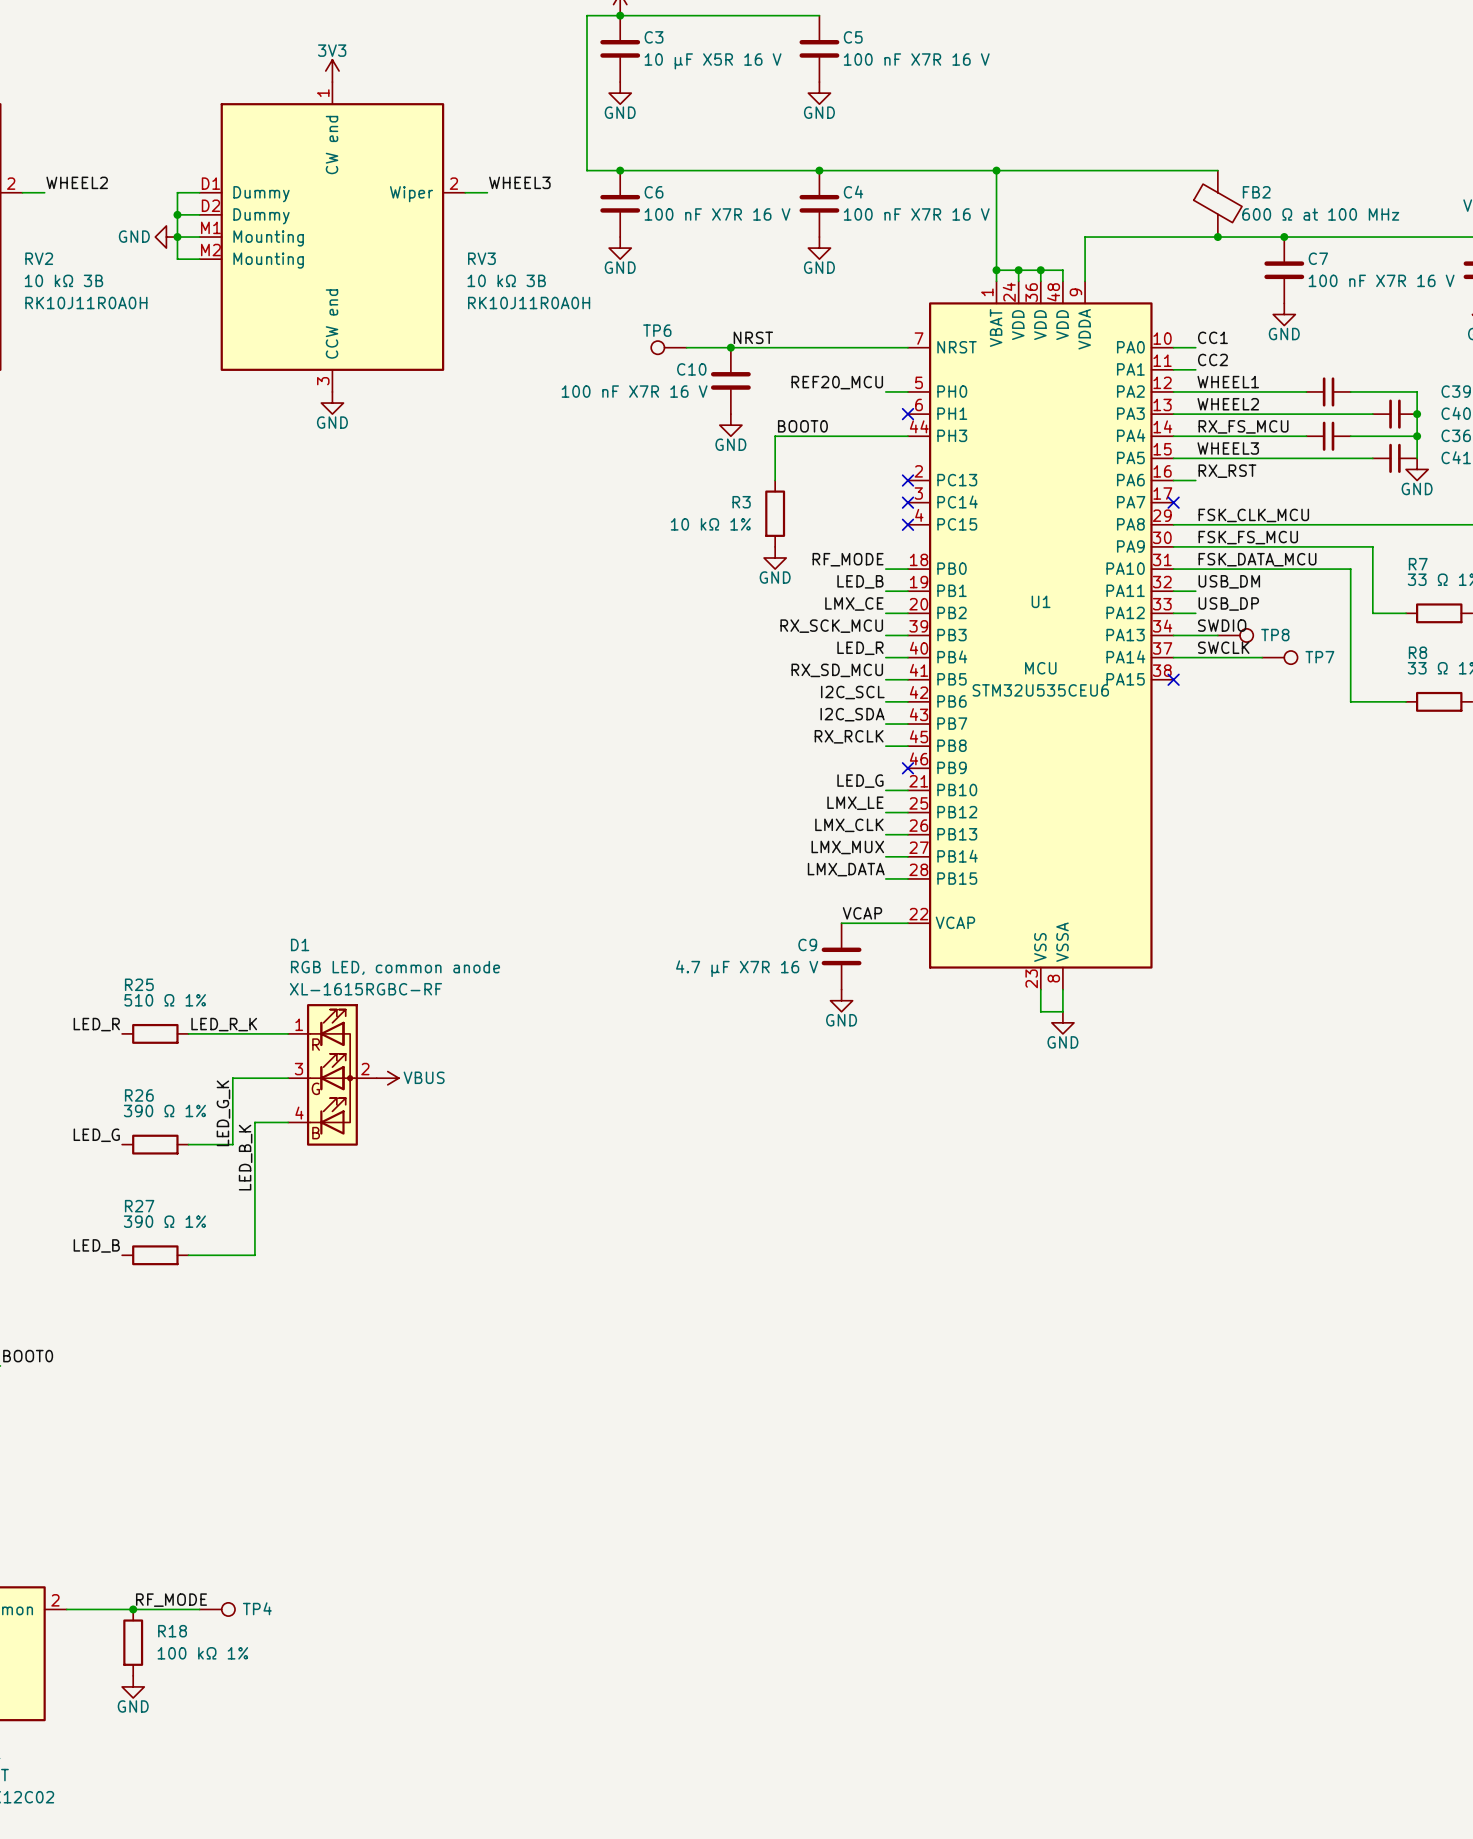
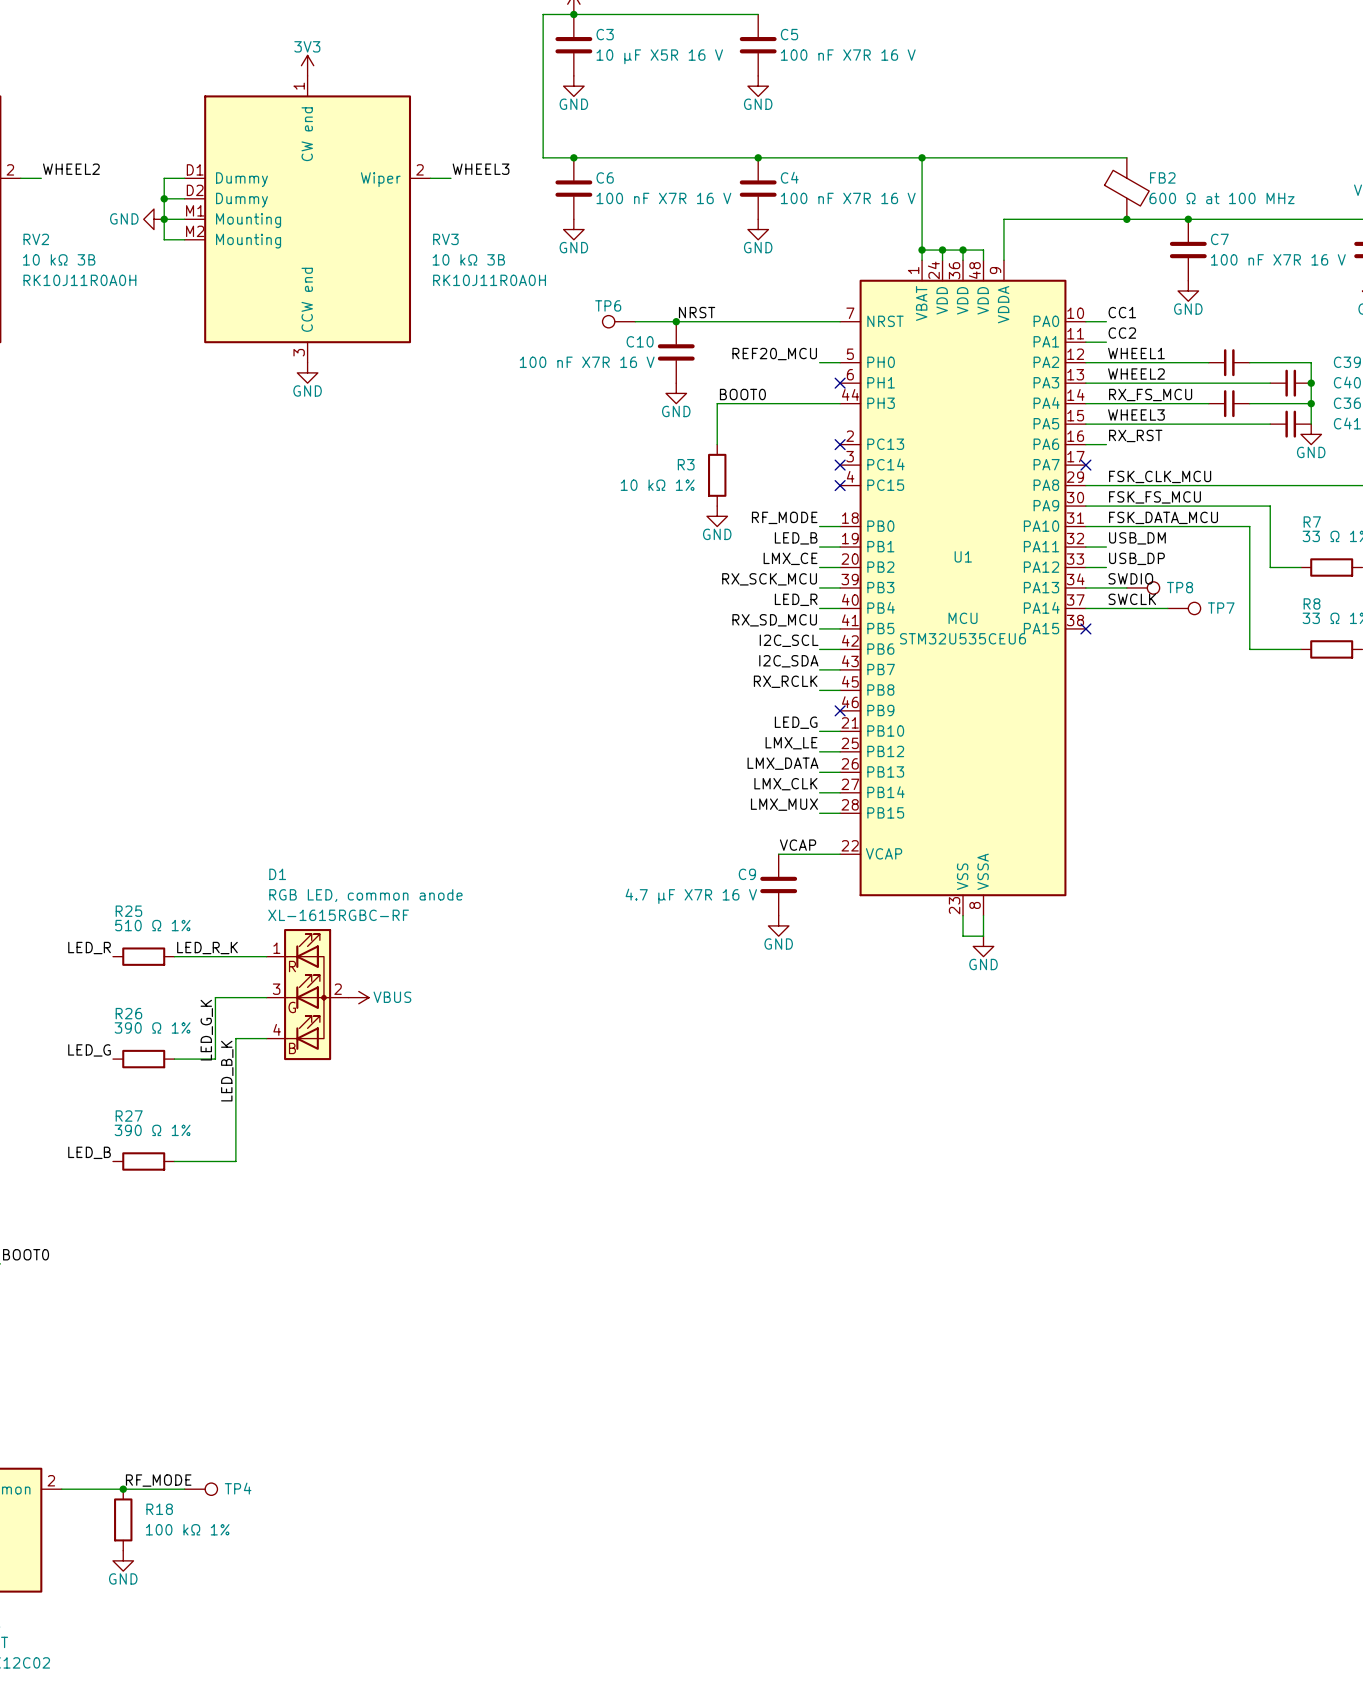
label: LMX_CLK (849, 825) -> LMX_DATA (782, 763)
label: LMX_MUX (847, 847) -> LMX_CLK (785, 784)
label: LMX_DATA (846, 869) -> LMX_MUX (784, 804)

